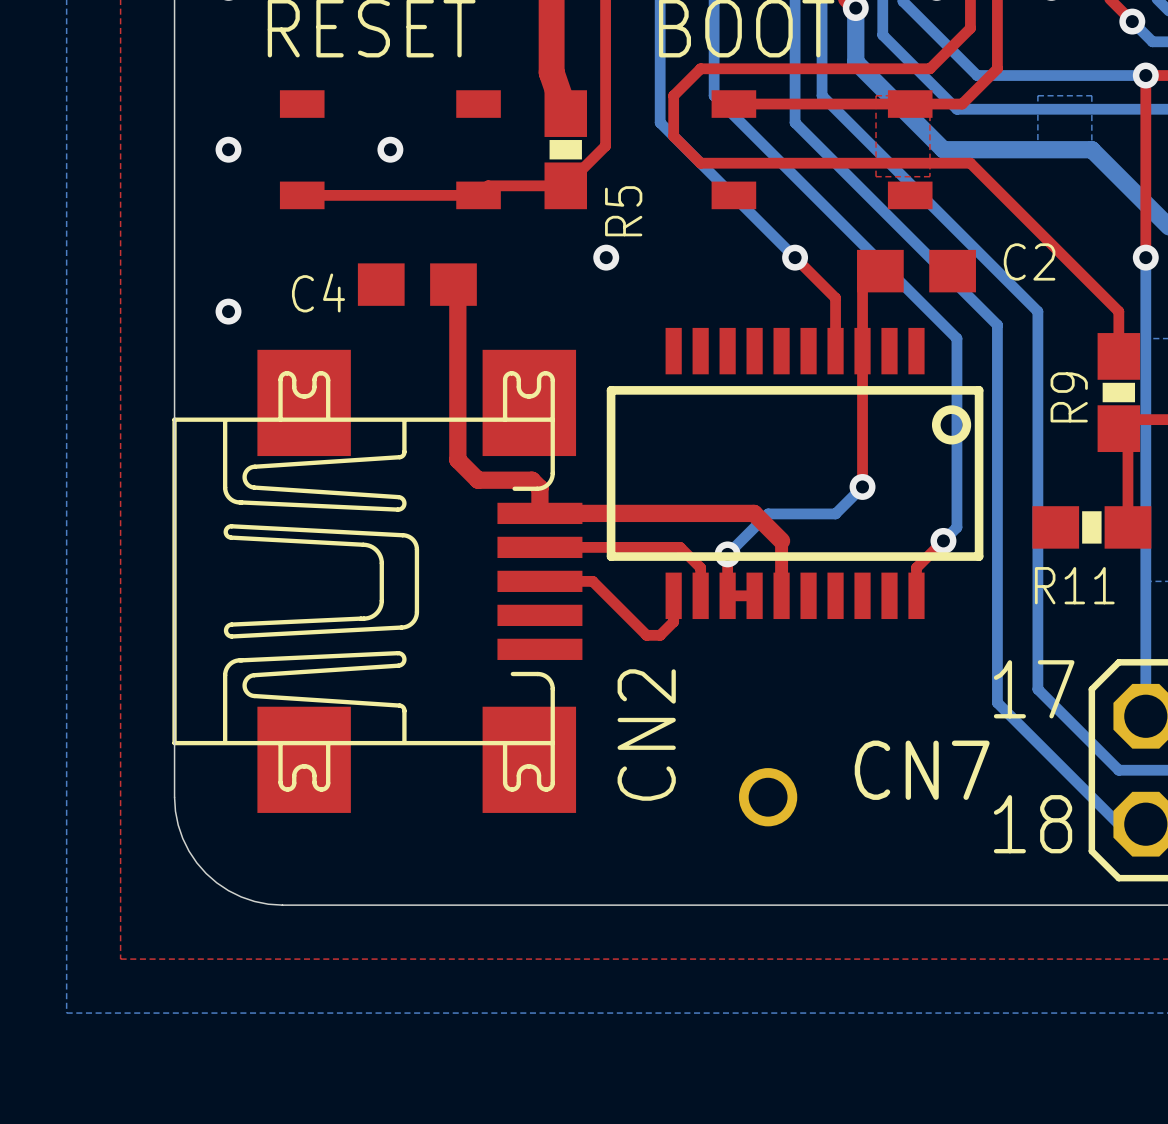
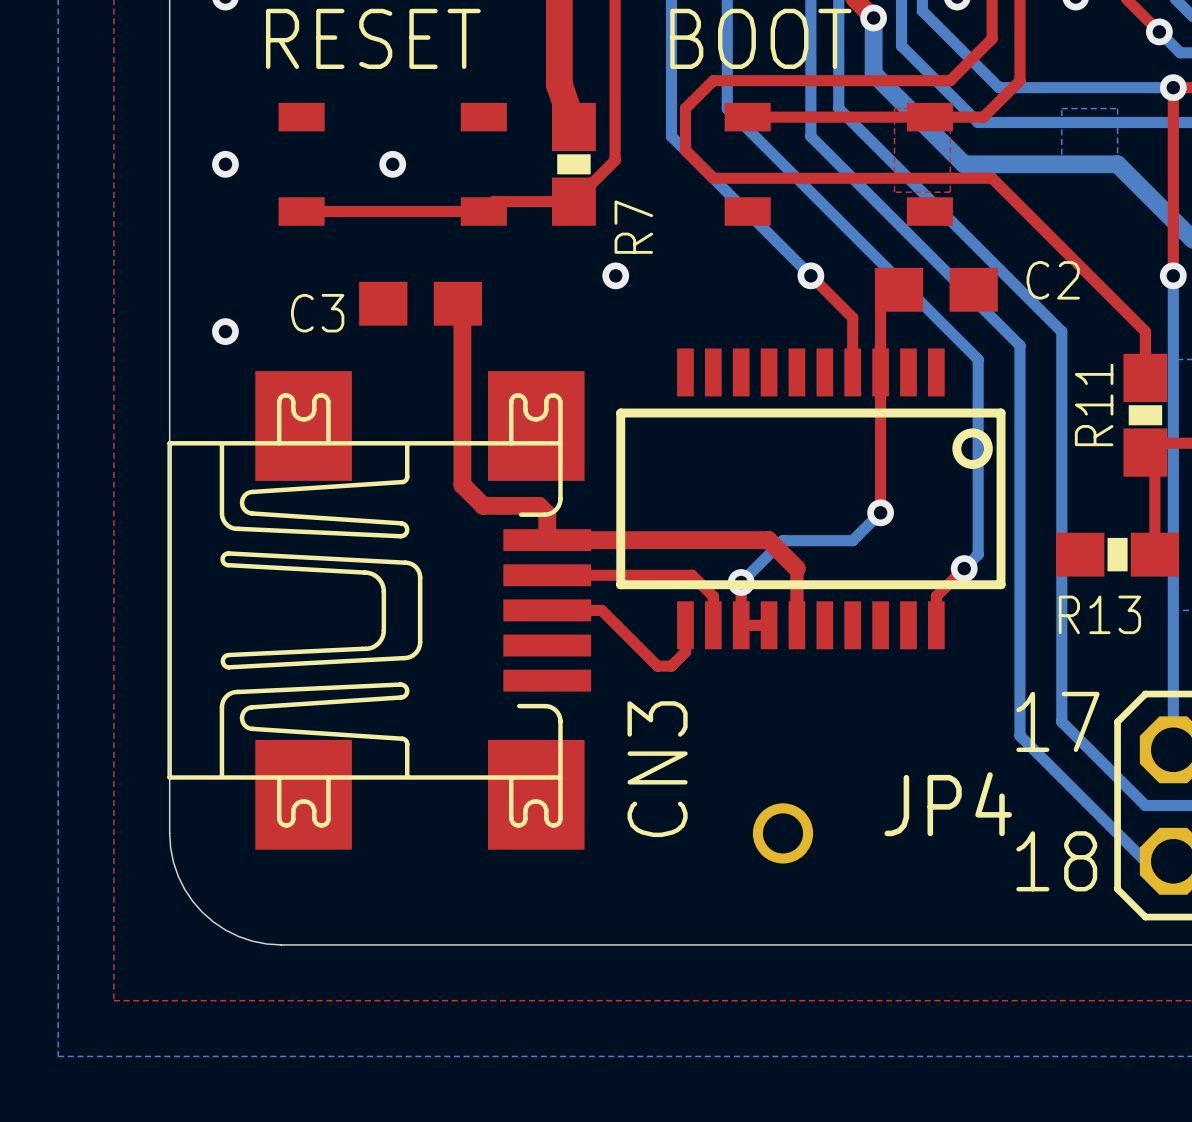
R5 name: R5 (623, 211) -> R7 (633, 227)
C4 name: C4 (318, 292) -> C3 (317, 313)
R9 name: R9 (1069, 397) -> R11 (1094, 404)
R11 name: R11 (1074, 585) -> R13 (1099, 614)
CN2 name: CN2 (646, 735) -> CN3 (657, 769)
CN7 name: CN7 (922, 770) -> JP4 (948, 804)

